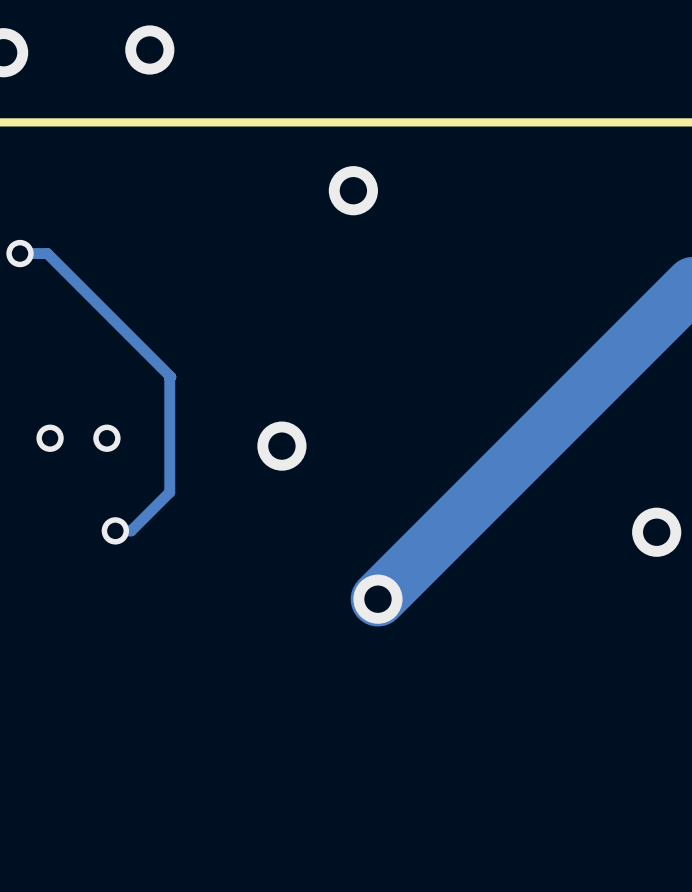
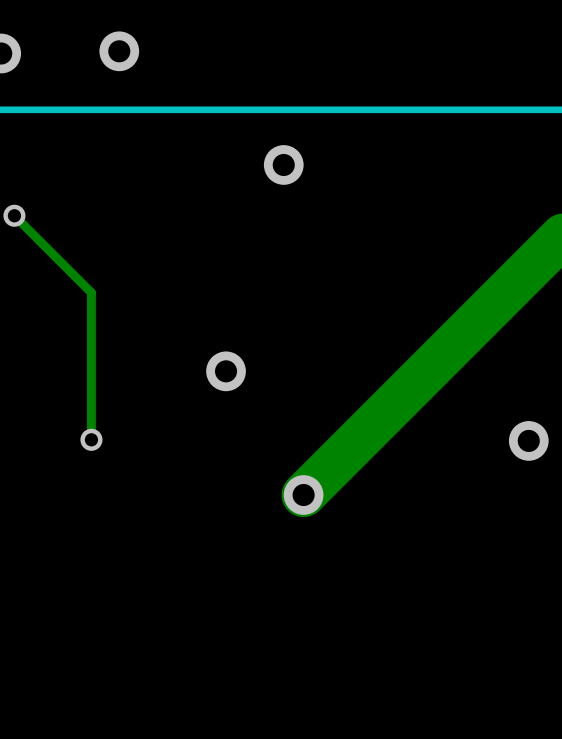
track: (20, 253) (47, 253) (170, 377) (169, 492) (131, 530) (115, 530) -> (14, 215) (91, 292) (91, 439)
via: (50, 438) -> none
via: (106, 438) -> none

